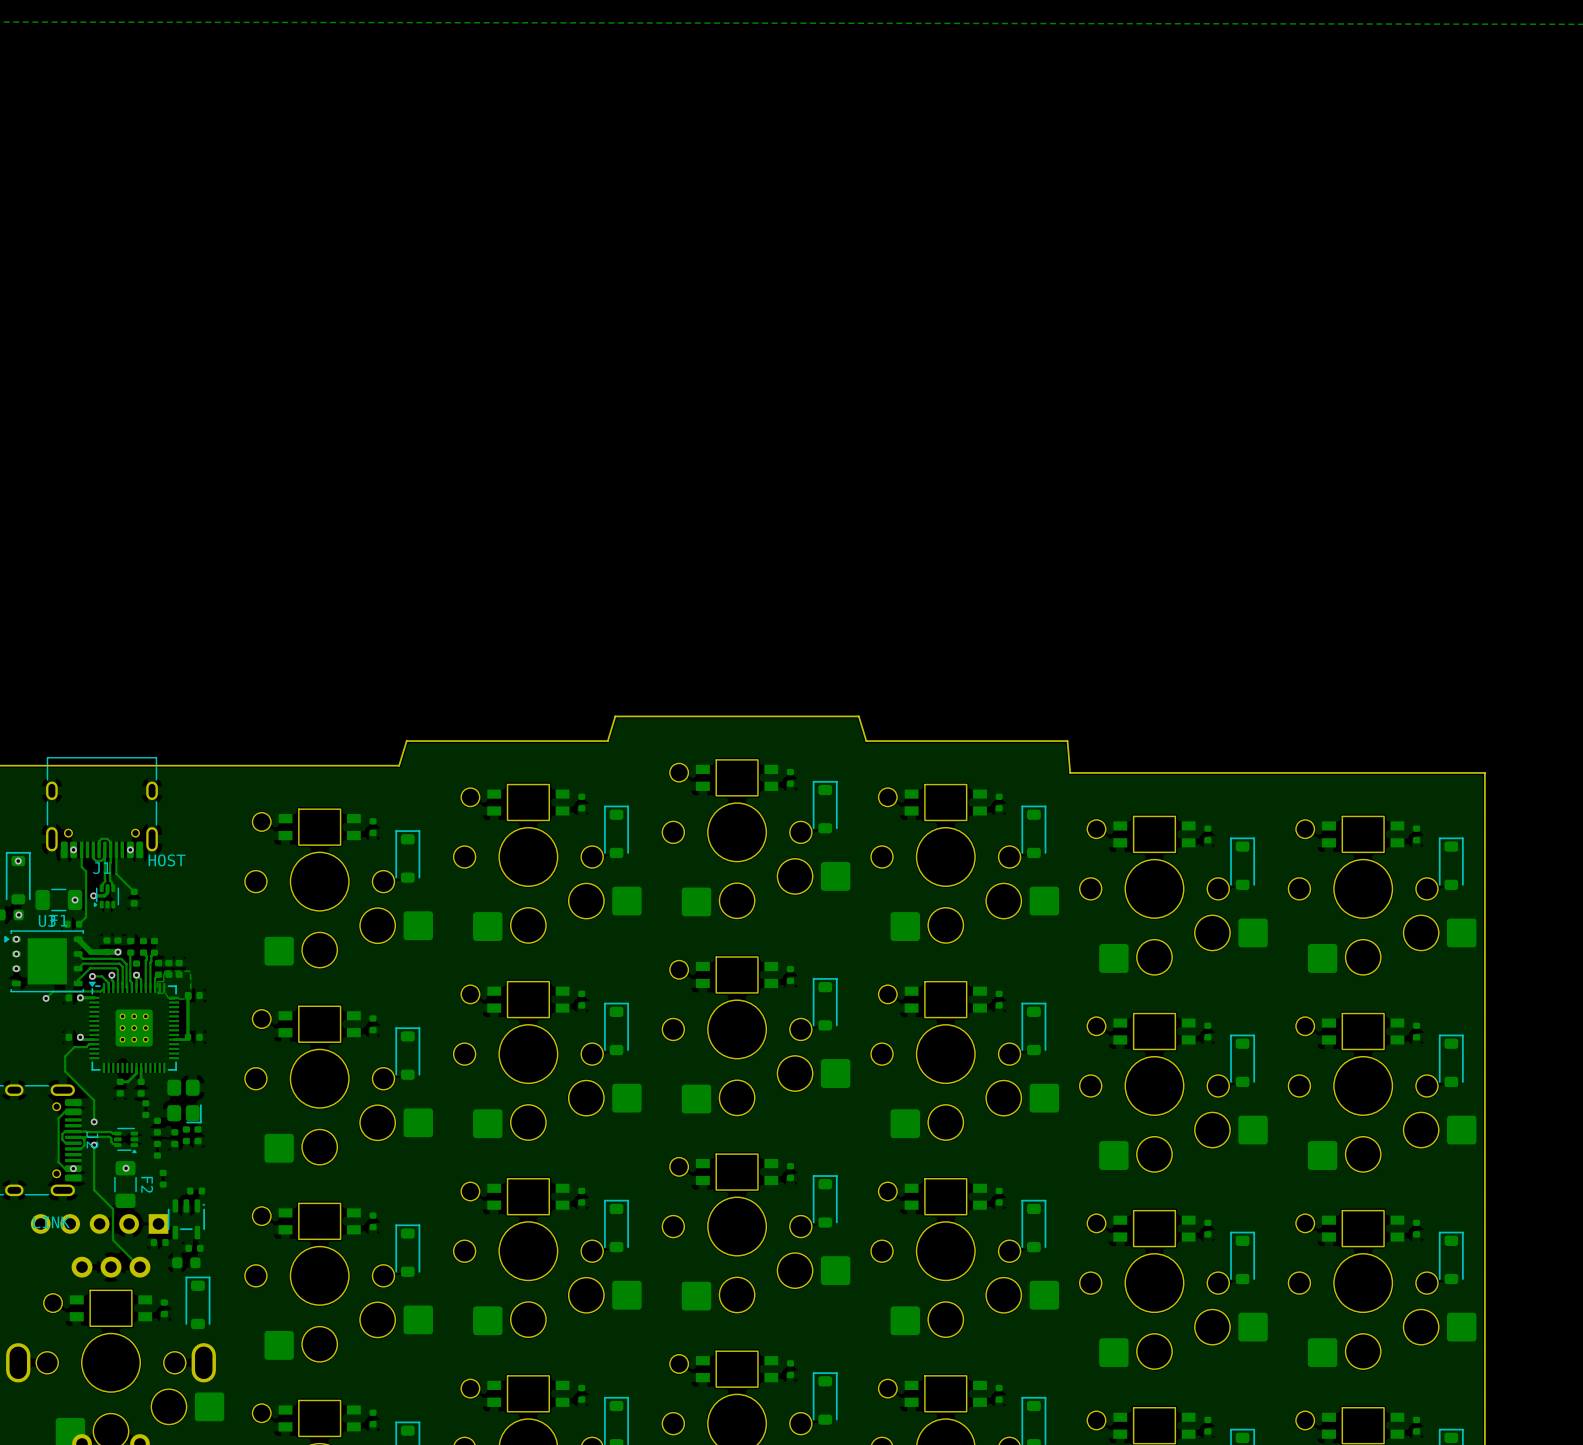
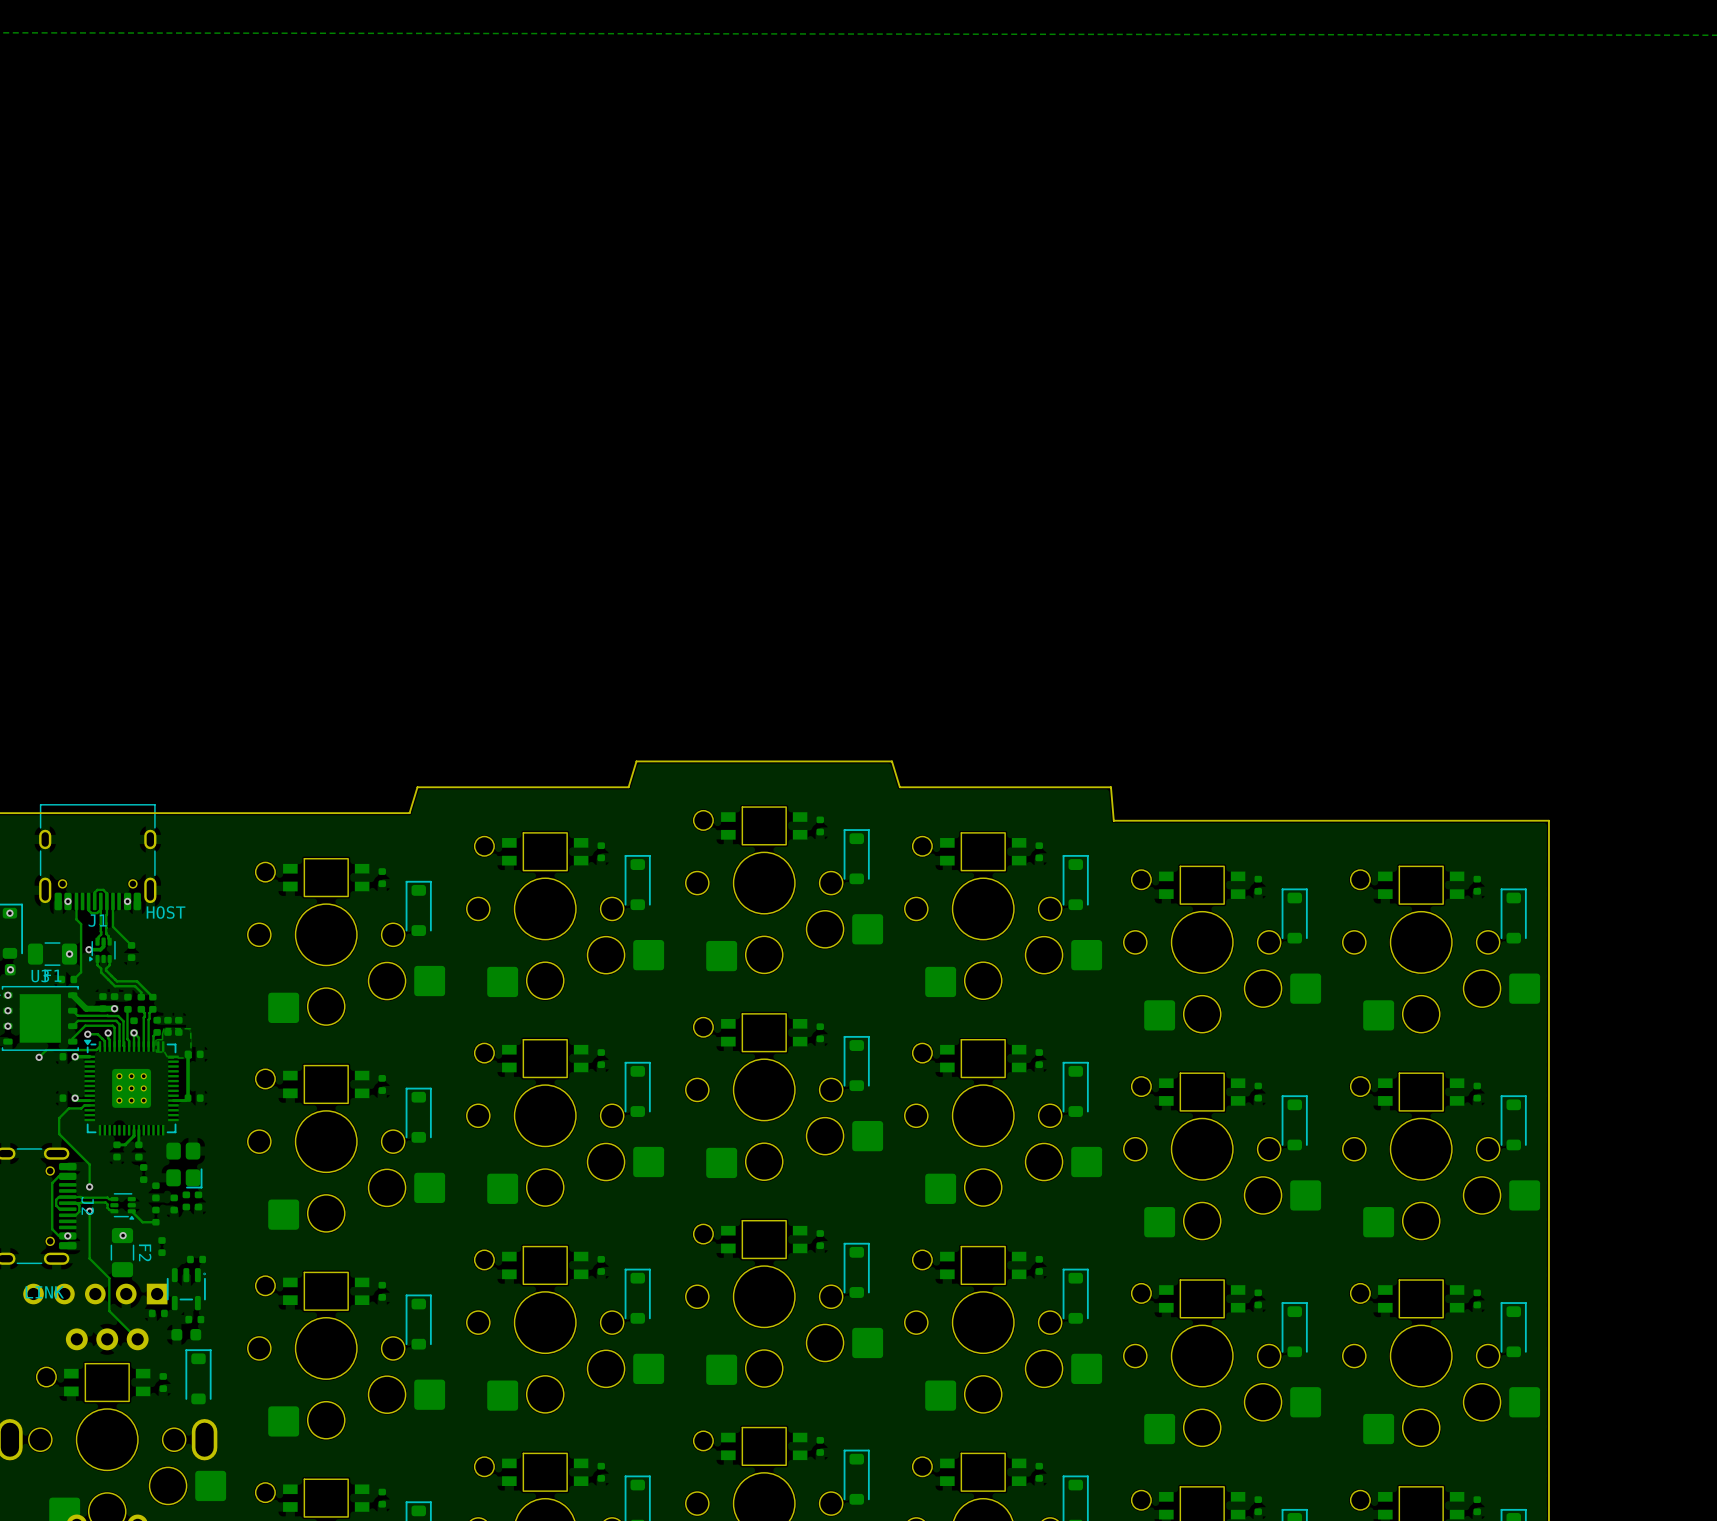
track: none -> (97, 958) (97, 965) (101, 968) (101, 972) (114, 986) (135, 986) (141, 992) (141, 997)
track: none -> (109, 958) (109, 965) (106, 970) (116, 981) (137, 981) (152, 997)
track: none -> (131, 1211) (142, 1222) (155, 1222)

